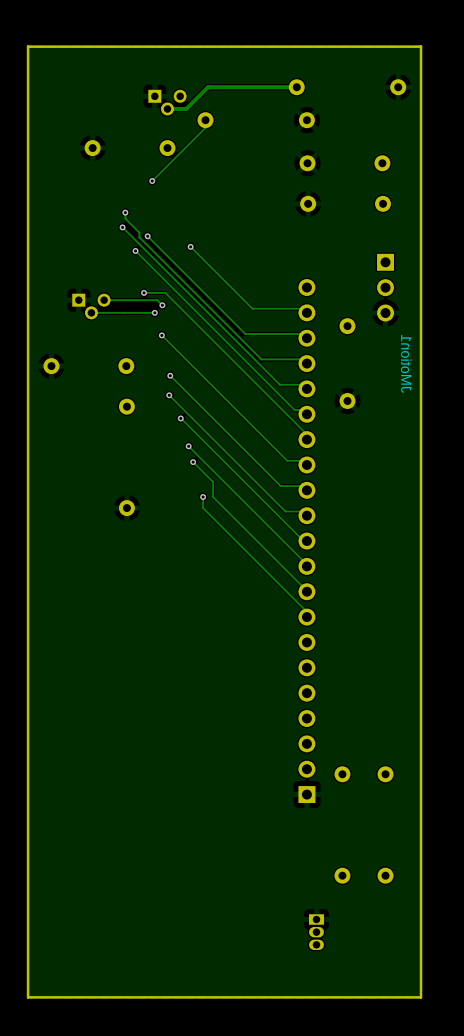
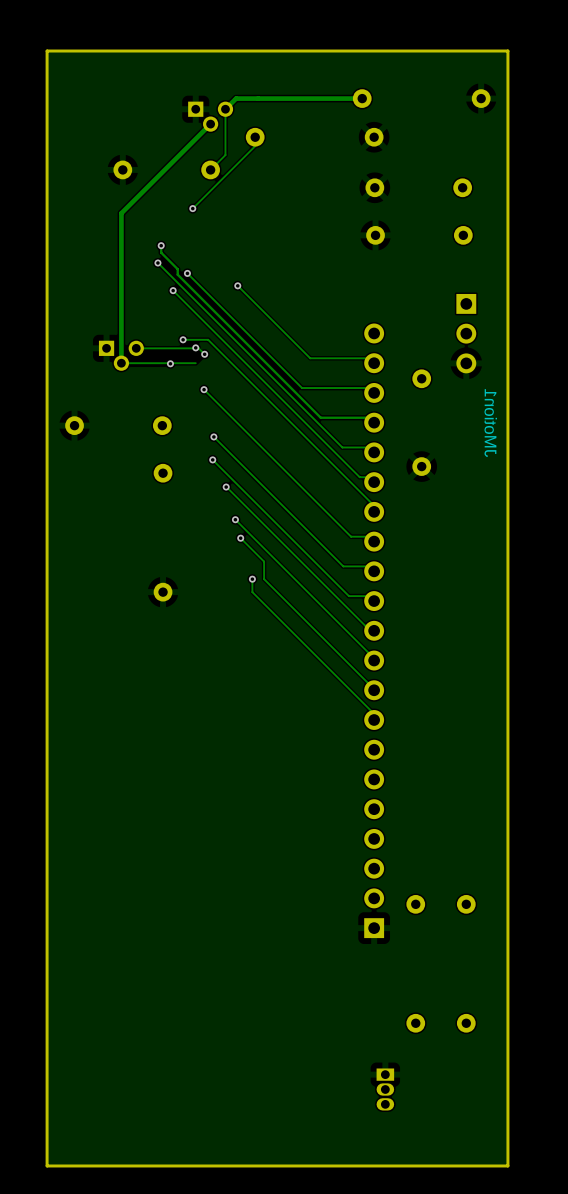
track: (208, 87) (186, 108) (167, 108) -> (258, 98) (236, 98) (225, 109) (225, 155) (210, 169)
track: none -> (210, 124) (121, 213) (121, 358)
via: none -> (195, 347)
via: (154, 312) -> none
via: none -> (170, 363)

